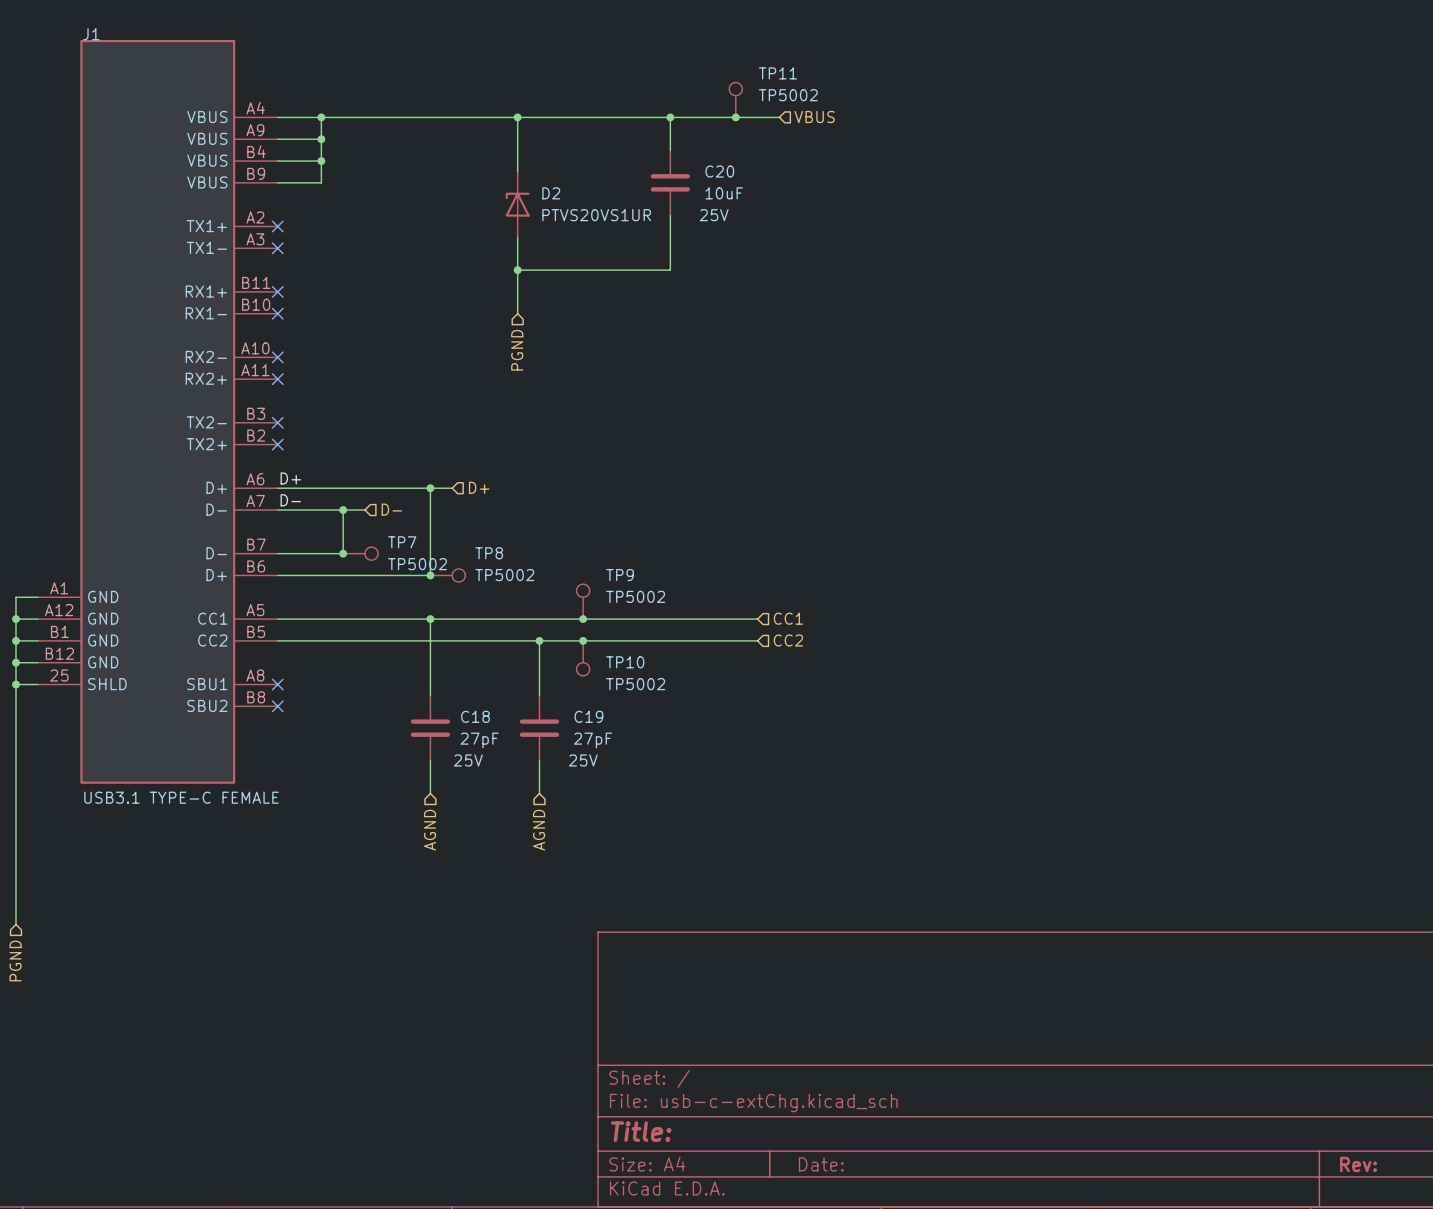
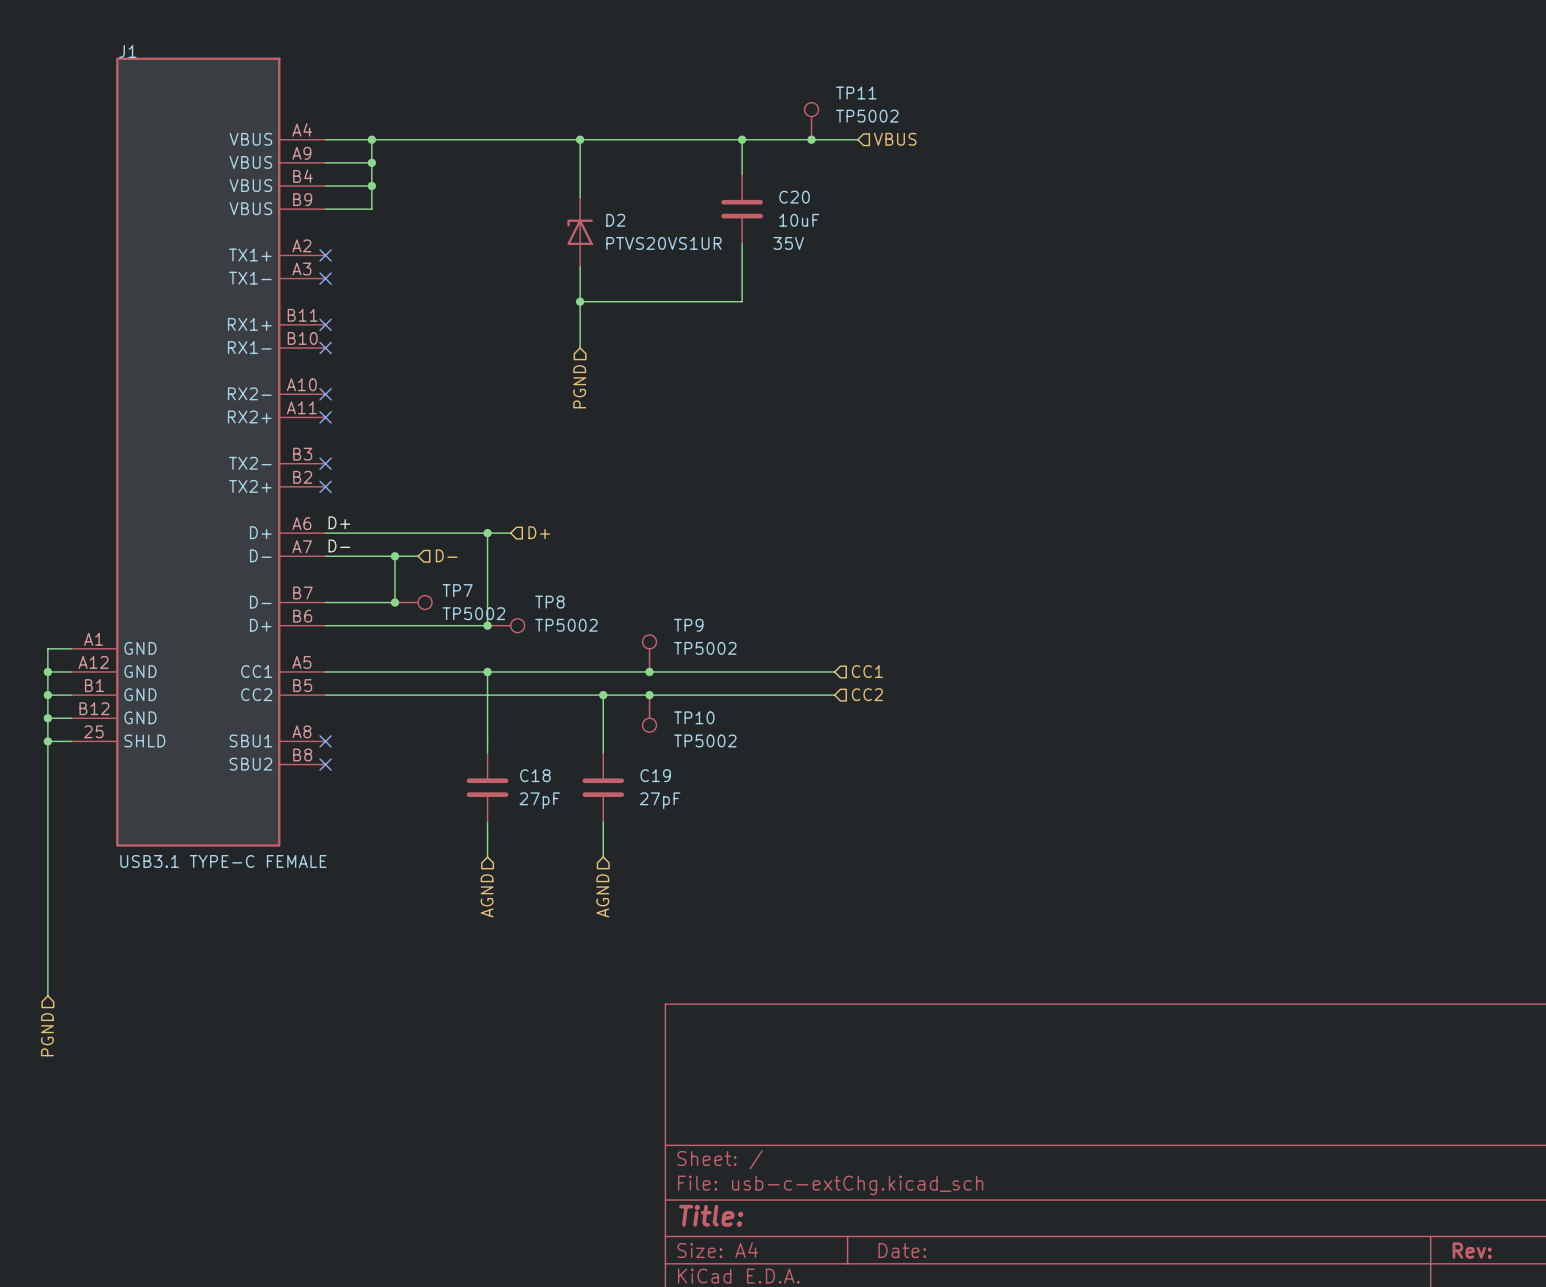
C20 text: 25V (714, 215) -> 35V (788, 243)
C18 text: 25V (468, 760) -> none
C19 text: 25V (583, 760) -> none

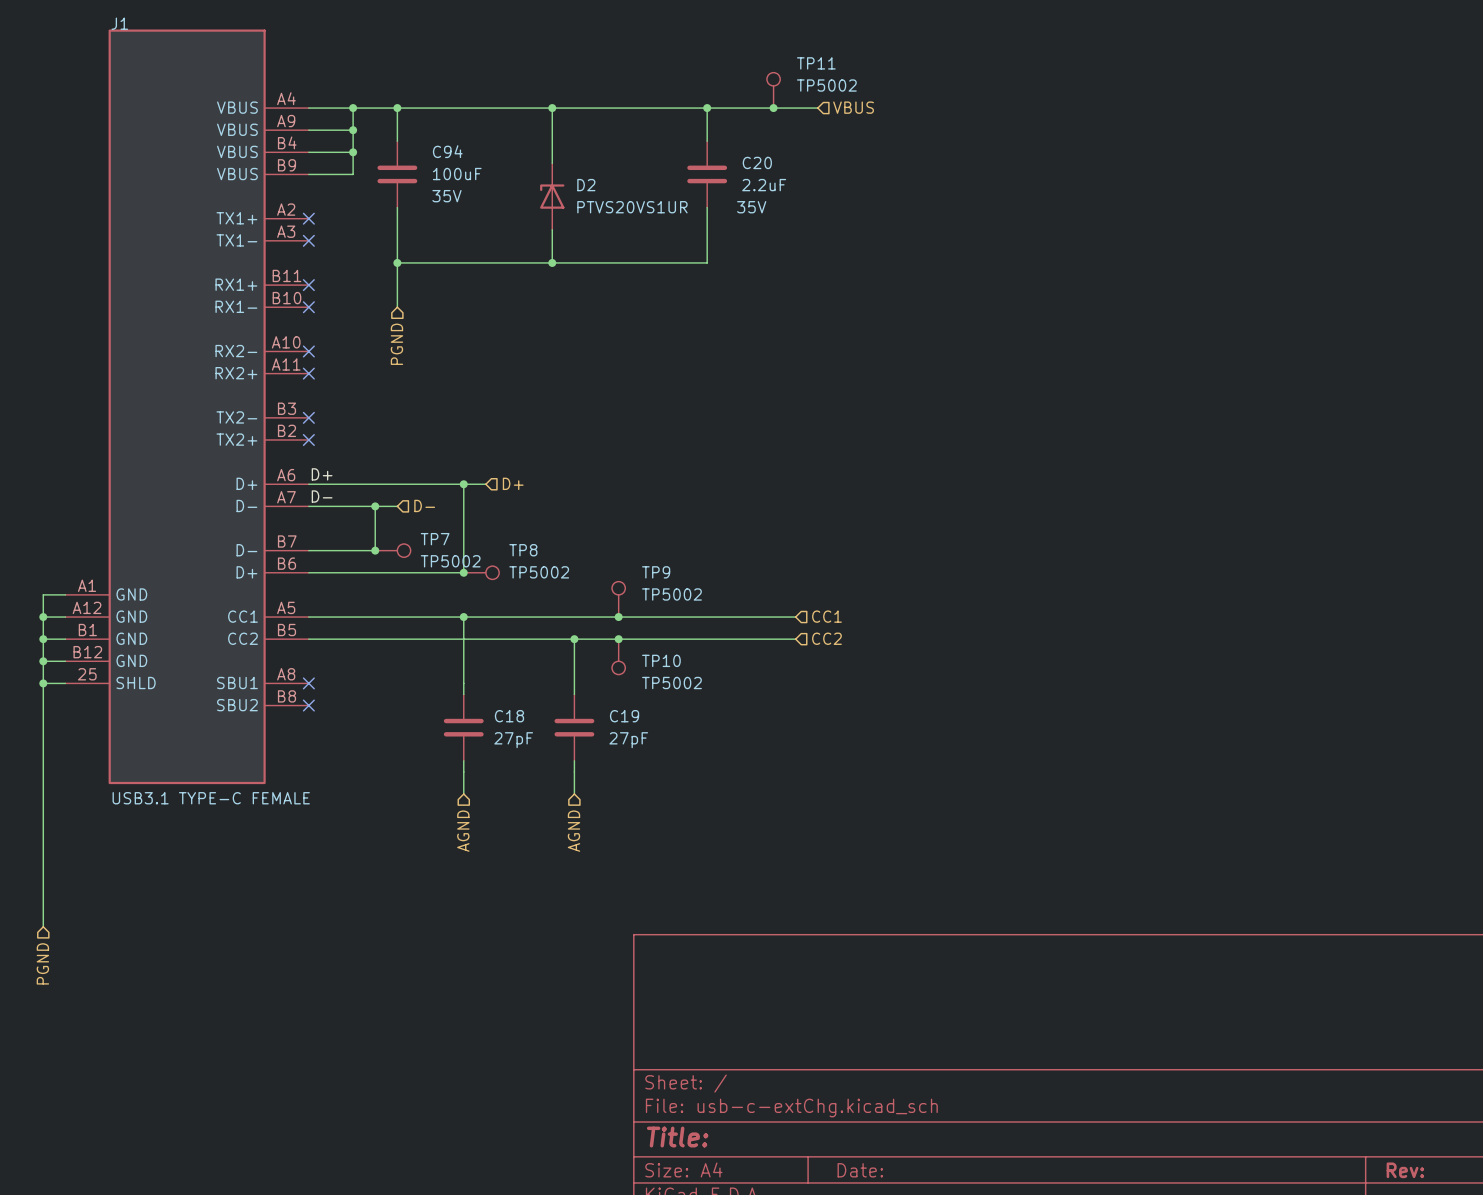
wire: none -> (397, 108) (397, 141)
junction: none -> (397, 108)
C94: none -> 100uF (397, 174)
C20 value: 10uF (799, 220) -> 2.2uF (764, 185)
wire: none -> (397, 207) (397, 307)
junction: none -> (397, 262)
wire: (580, 301) (580, 348) -> (552, 262) (397, 262)
hierarchical label position: PGND (579, 386) -> PGND (396, 344)

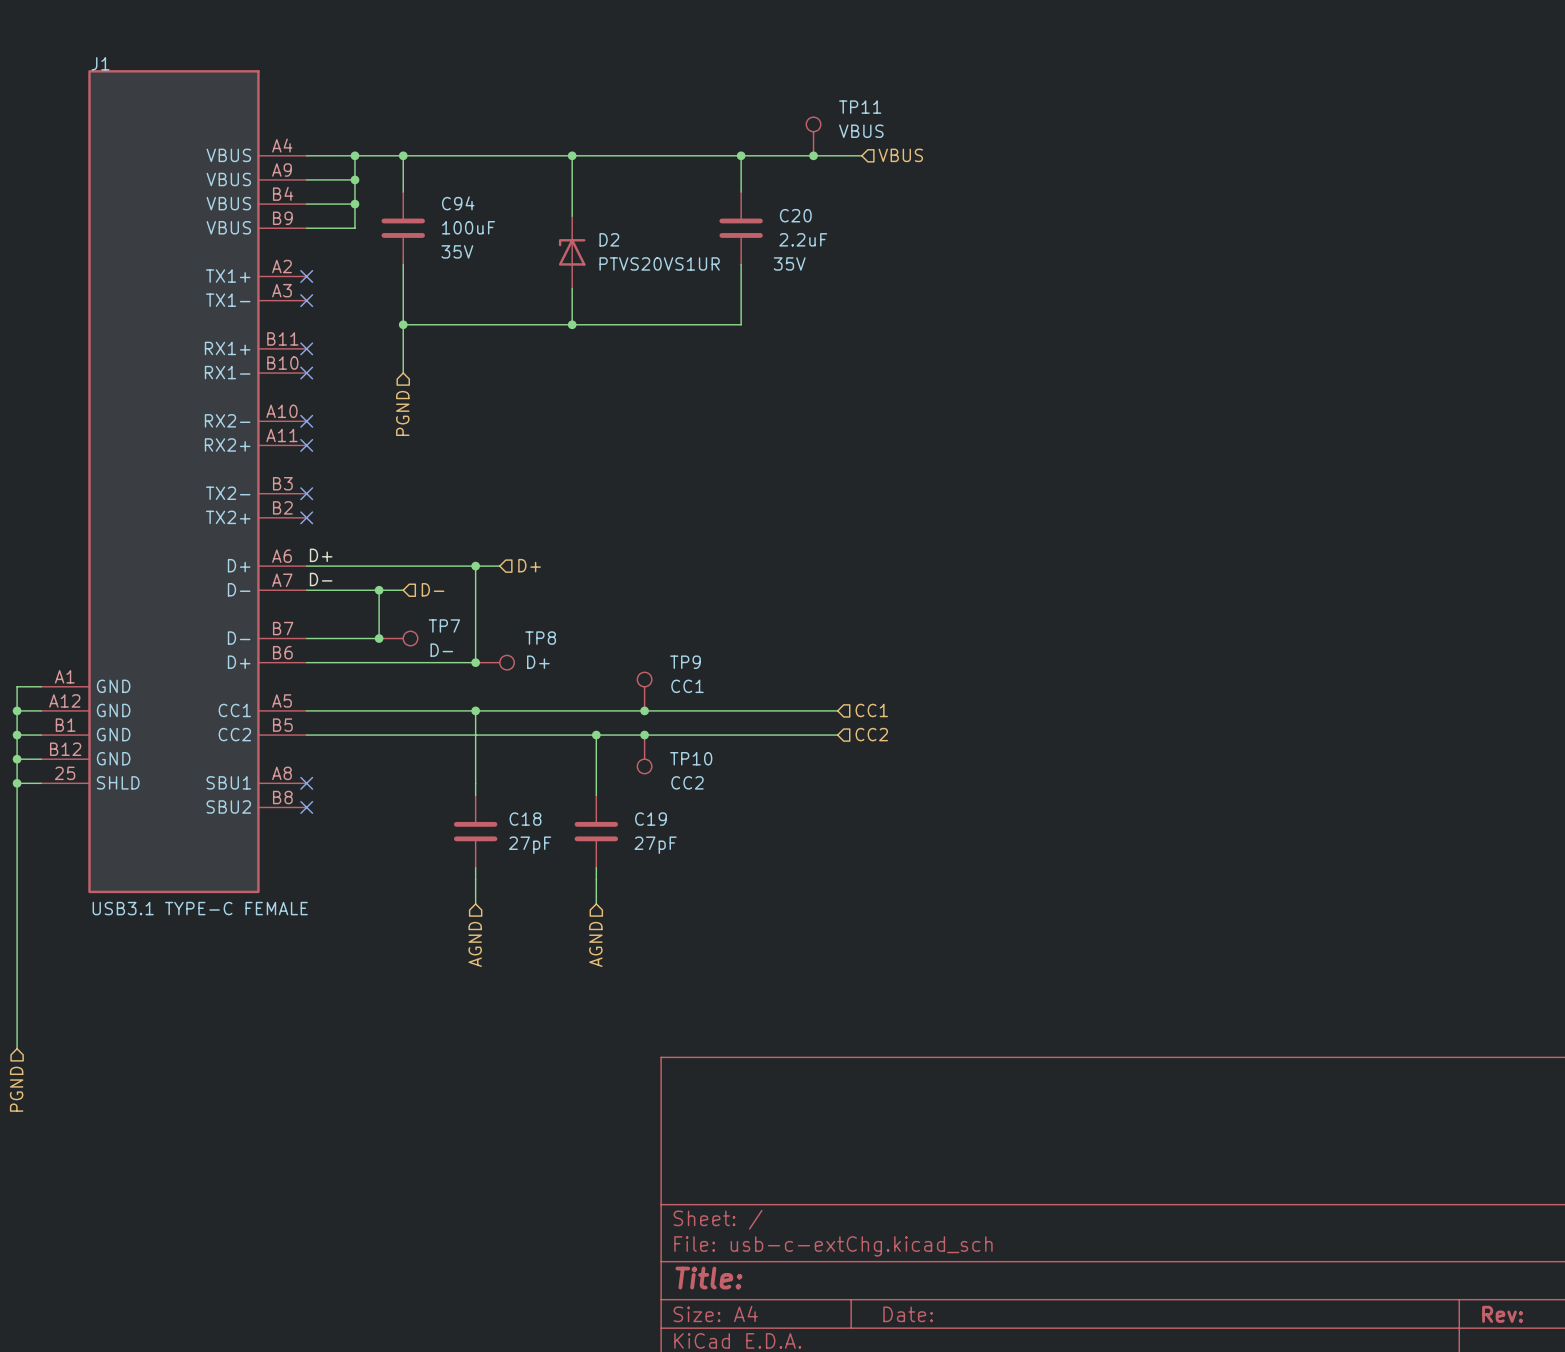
TP11 value: TP5002 (826, 85) -> VBUS (861, 131)
TP7 value: TP5002 (450, 561) -> D- (441, 650)
TP8 value: TP5002 (539, 572) -> D+ (538, 662)
TP9 value: TP5002 (671, 594) -> CC1 (687, 686)
TP10 value: TP5002 (671, 683) -> CC2 (687, 782)

